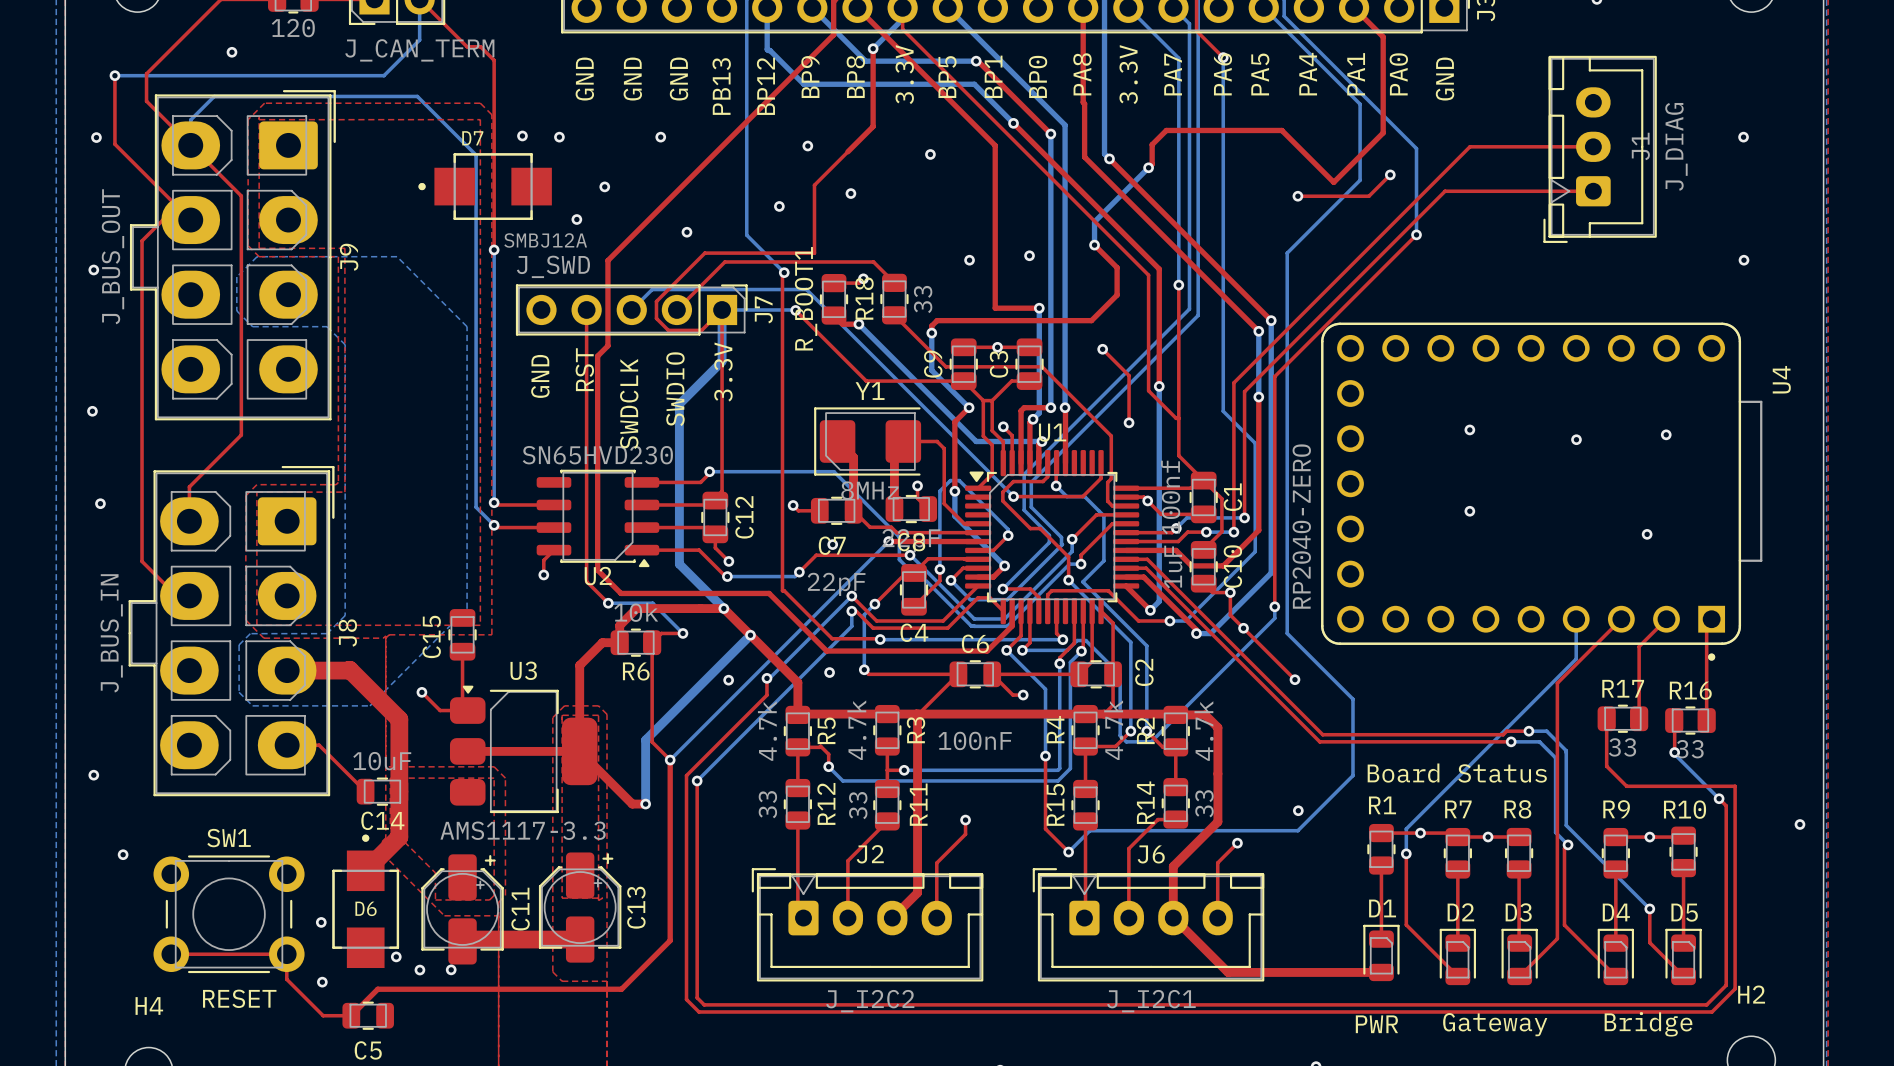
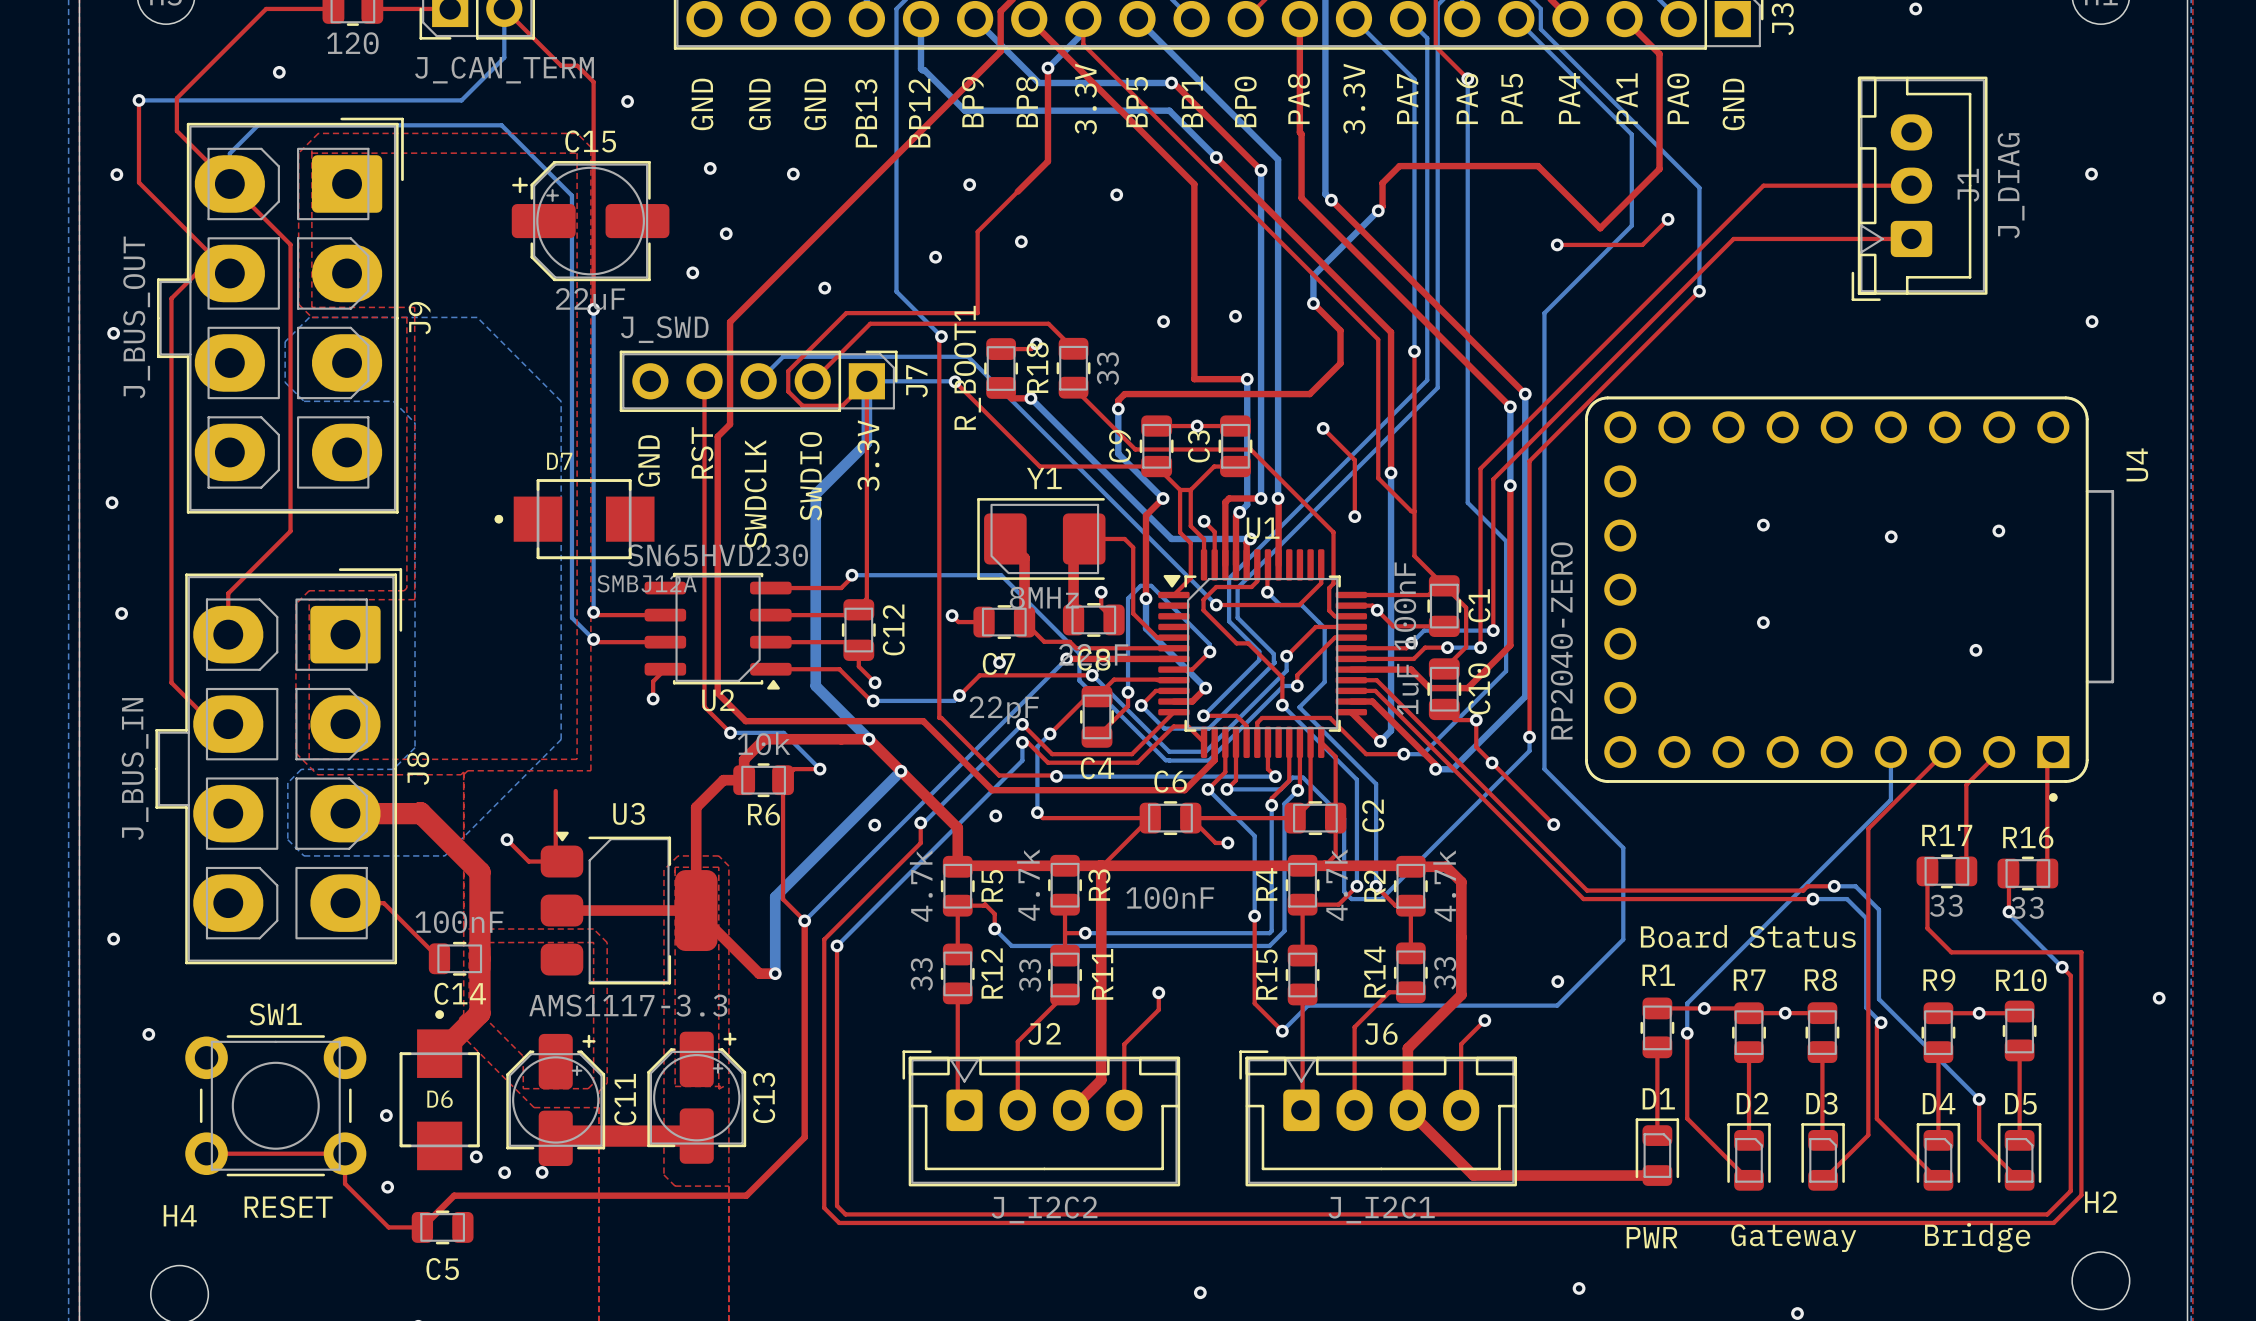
via: none -> (627, 101)
via: (522, 135) -> none
via position: (559, 137) -> (710, 168)
D7 position: (485, 186) -> (574, 519)
C15 value: none -> 22uF (590, 299)
C1 value: 100nf (1170, 497) -> 100nF (1405, 606)
C15 footprint: [448, 609, 477, 661] -> [511, 160, 670, 282]
C15 name position: C15 (431, 636) -> C15 (590, 141)
C14 value: 10uF (382, 761) -> 100nF (459, 922)

